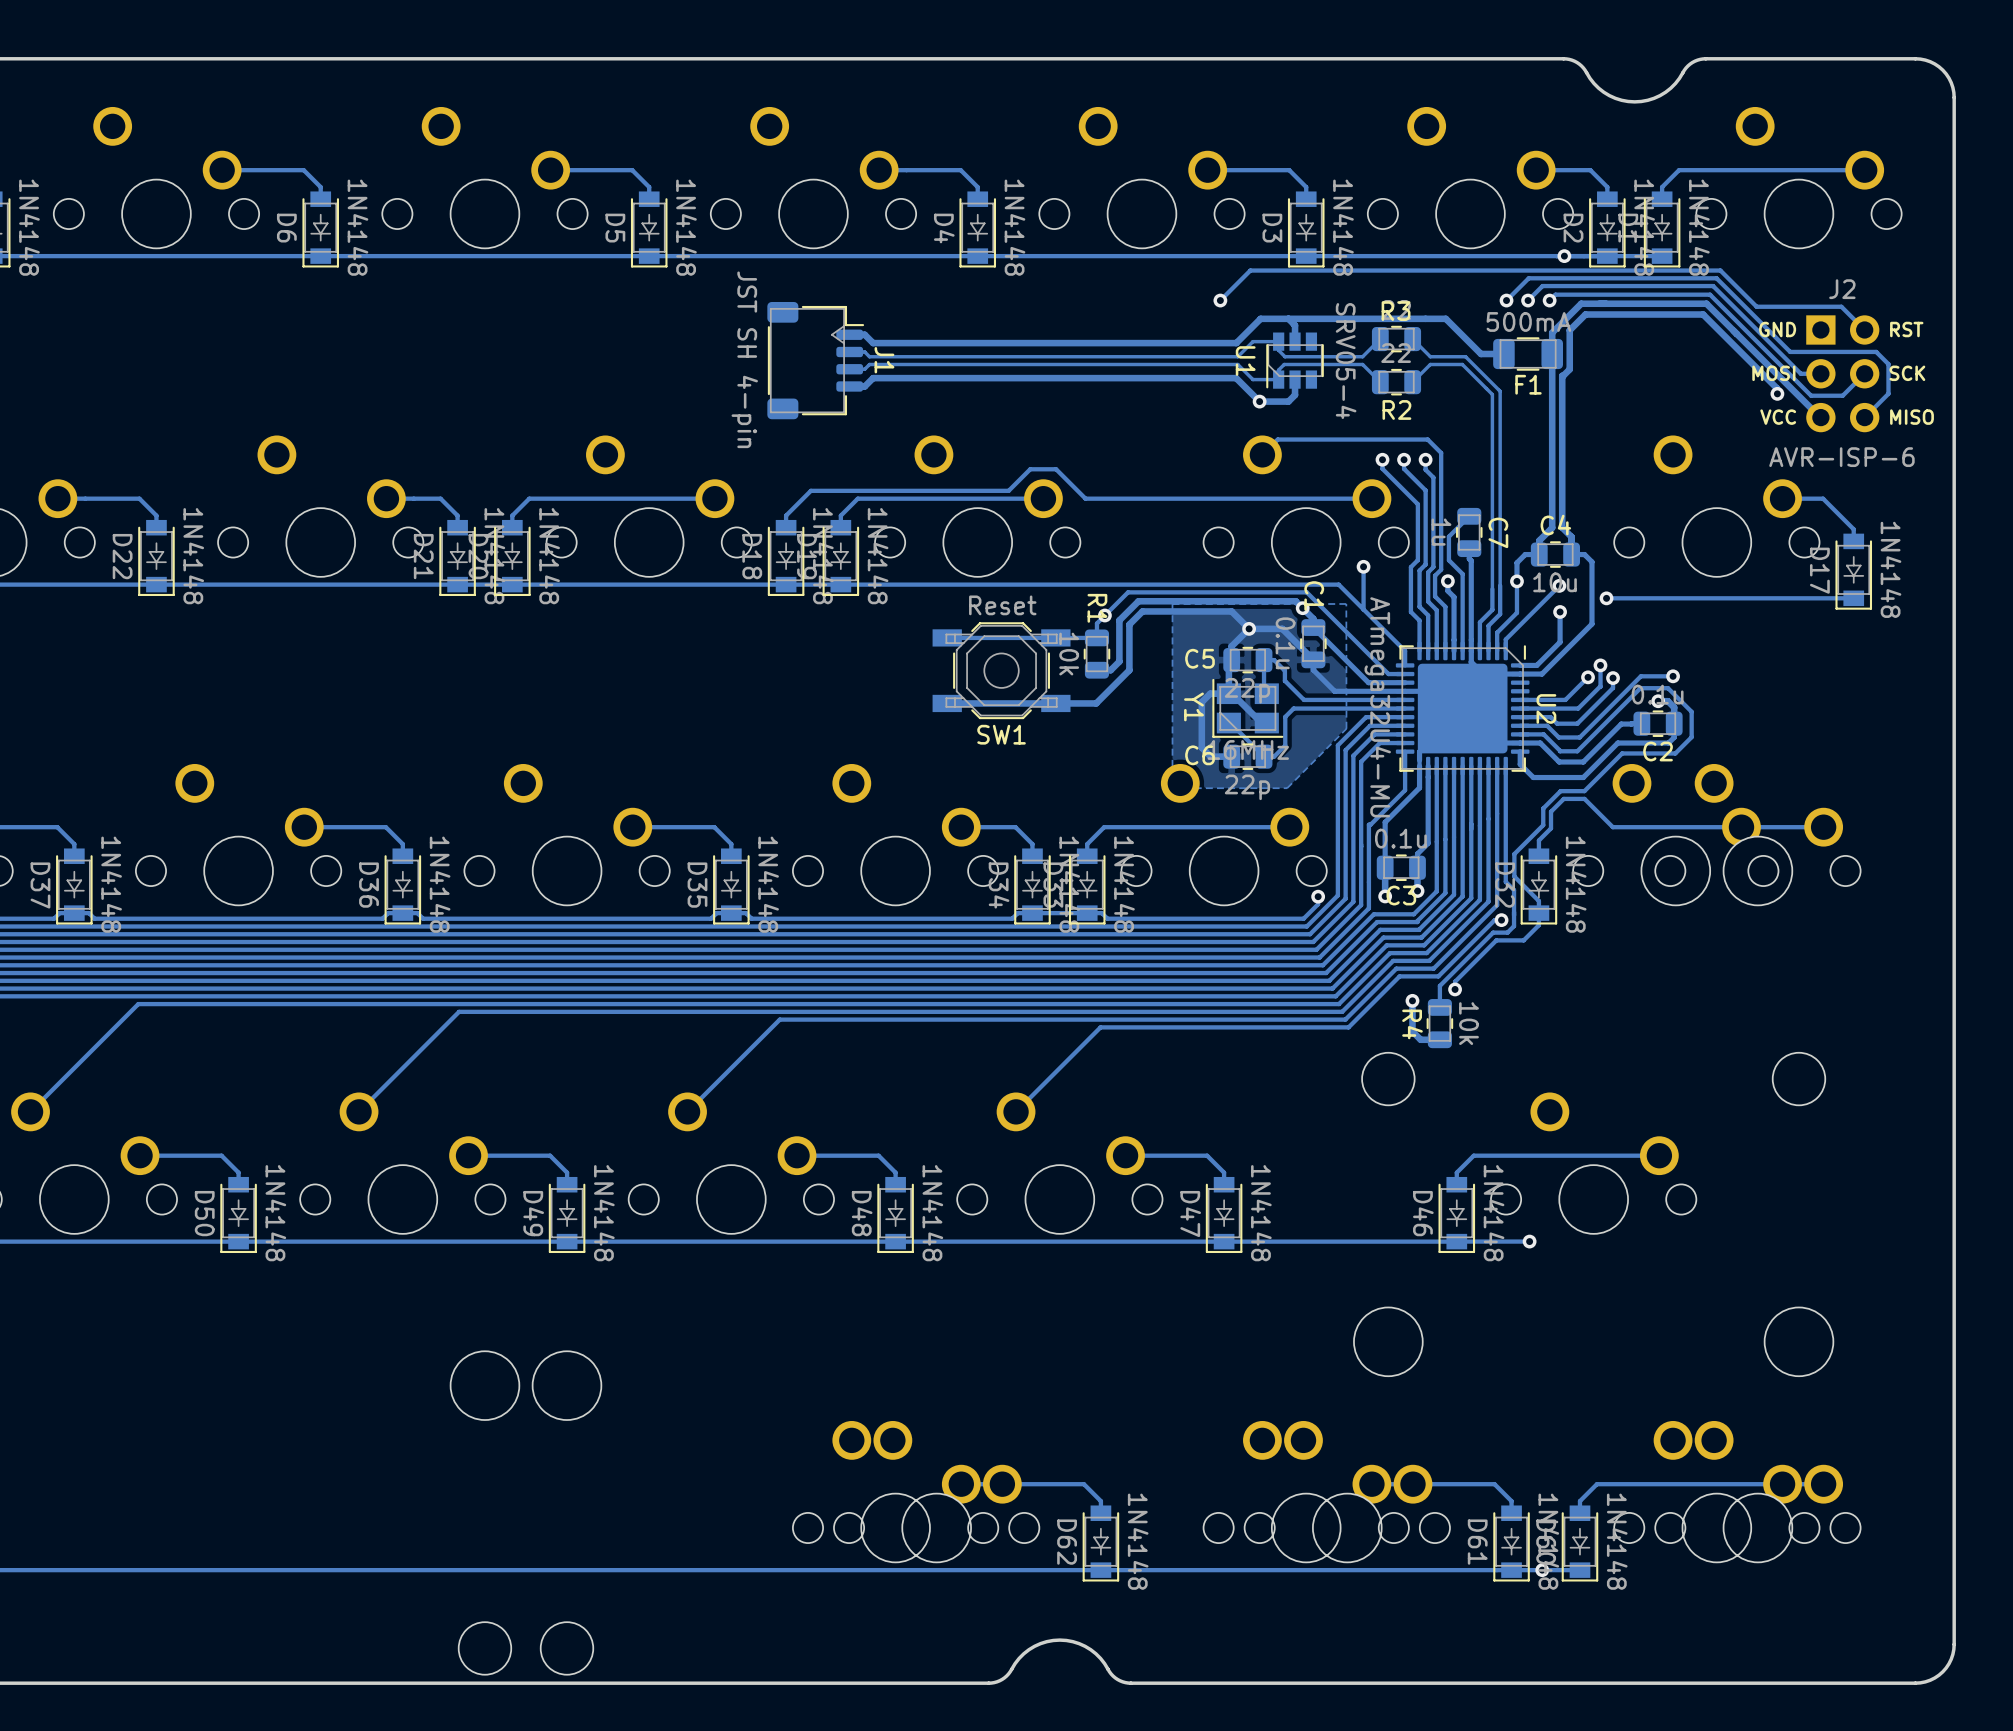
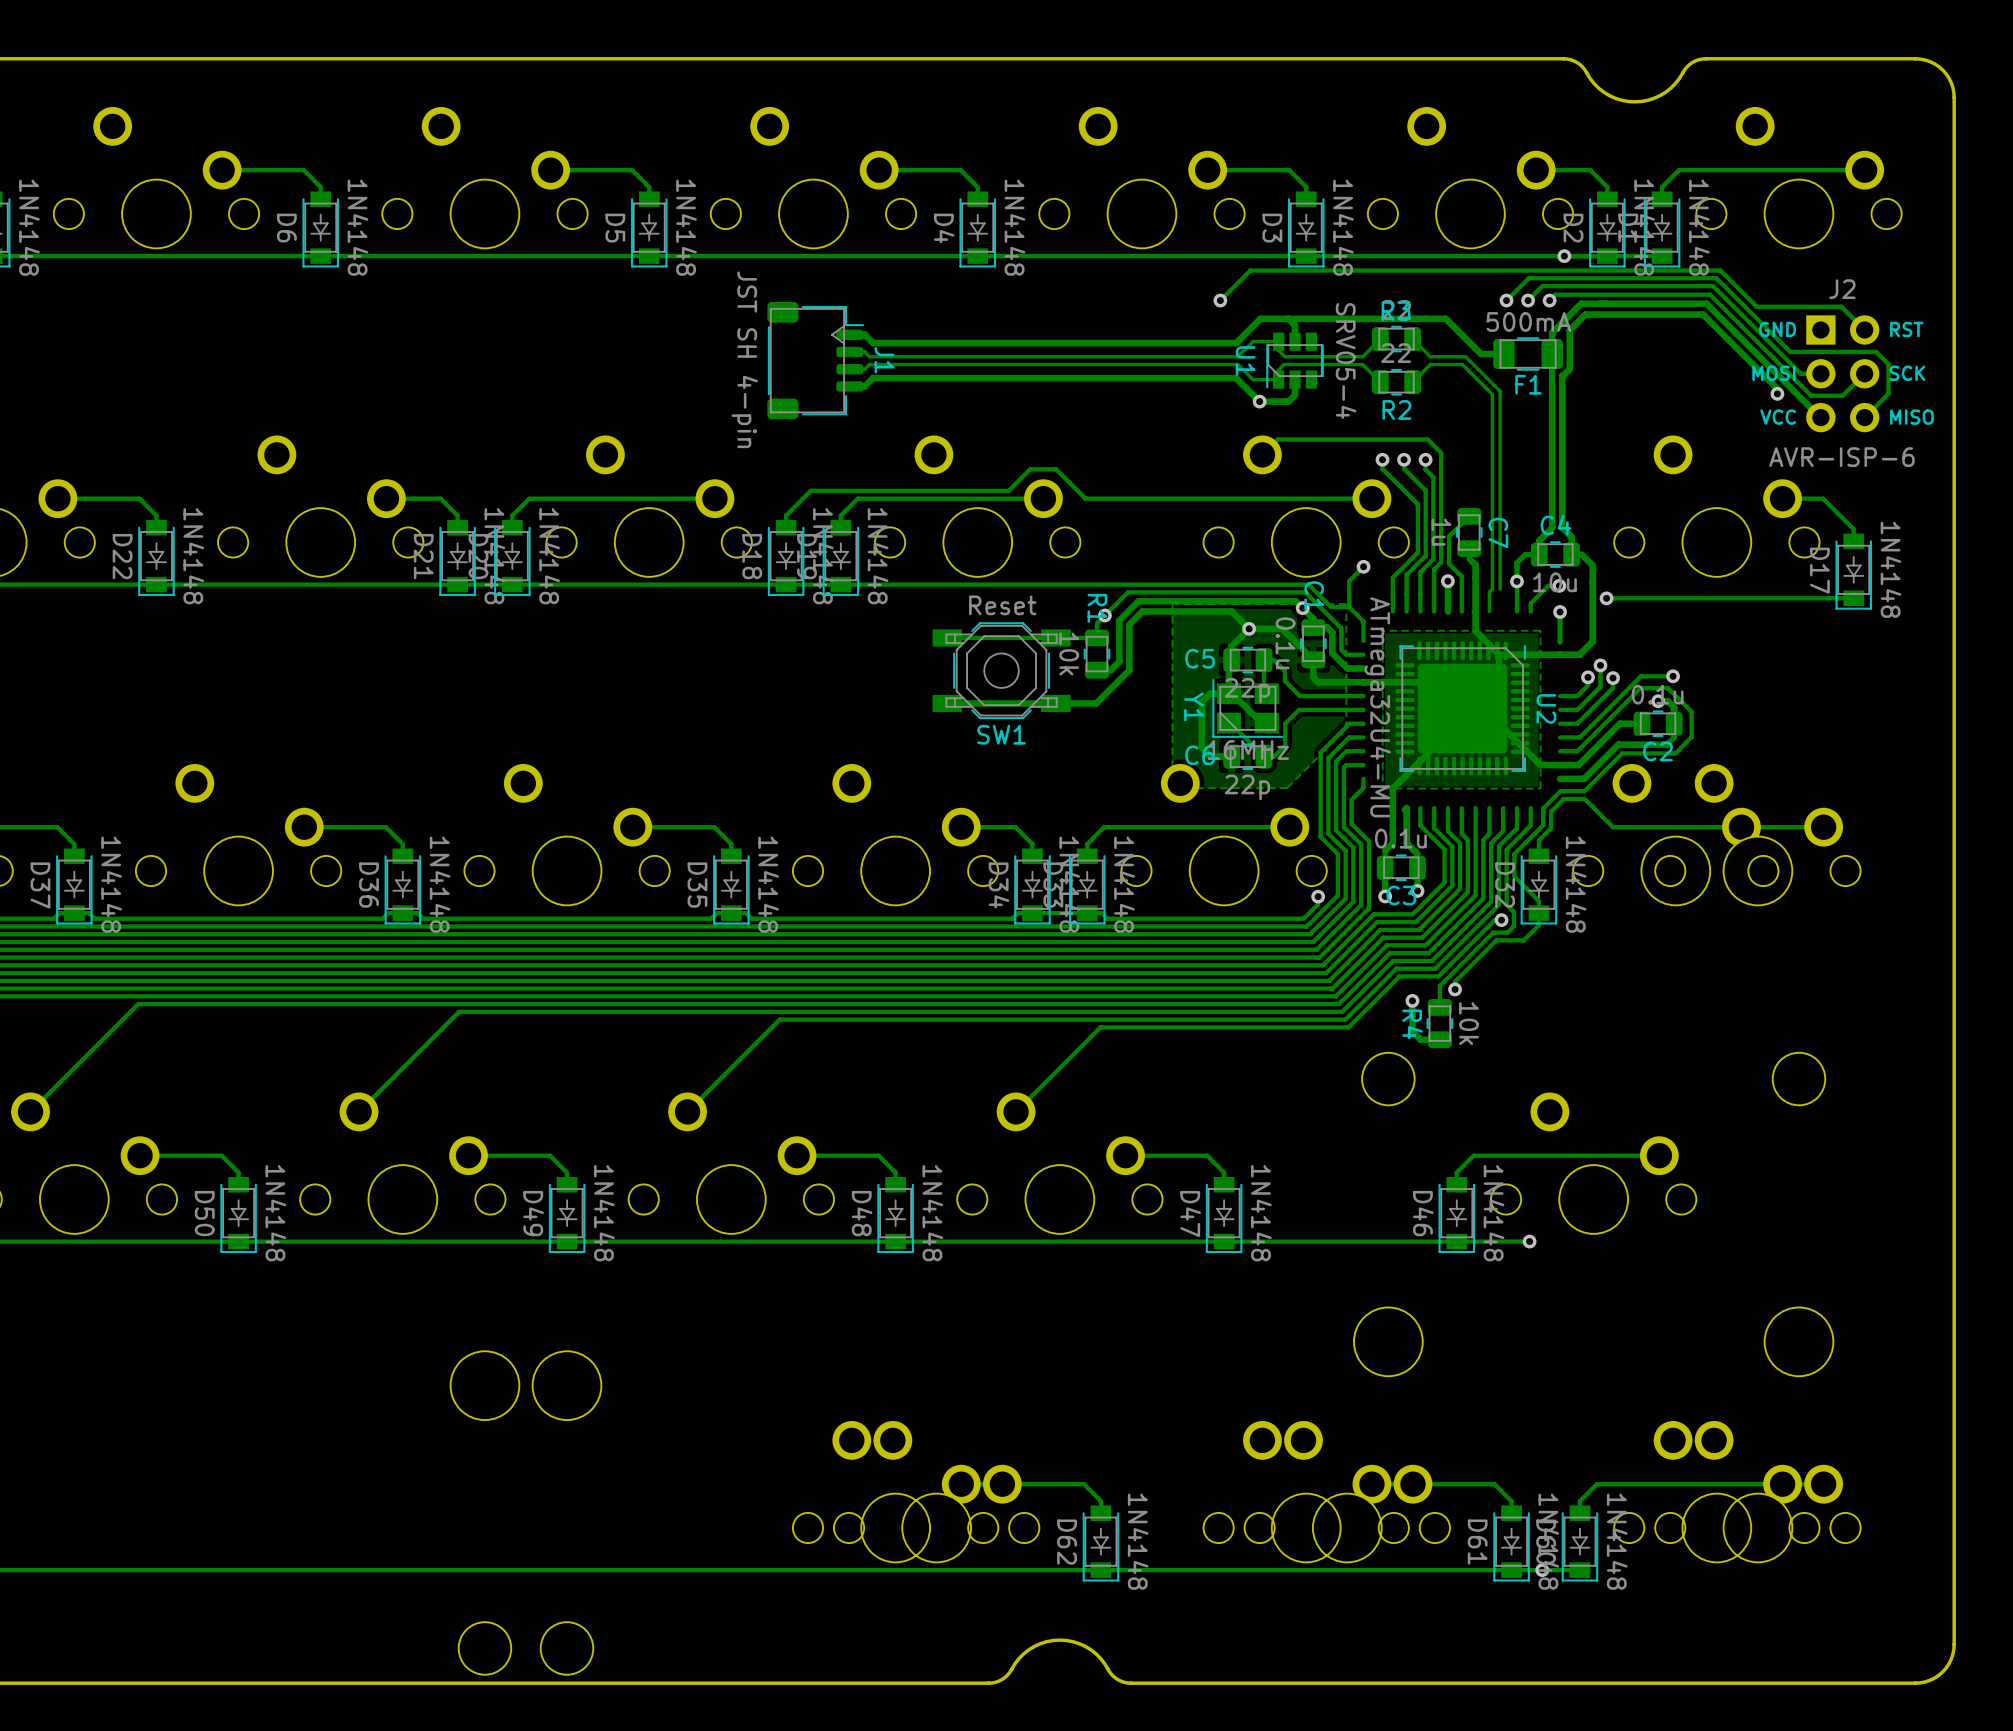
track: (1417, 552) (1417, 560) (1410, 567) (1410, 611) (1419, 620) (1419, 650) -> (1417, 552) (1392, 577) (1392, 611)
track: (1581, 554) (1584, 554) (1591, 561) (1591, 624) (1541, 674) (1483, 674) (1471, 661) -> (1581, 554) (1592, 565) (1592, 641) (1579, 654) (1499, 654)
track: (1425, 555) (1425, 564) (1419, 570) (1419, 606) (1428, 615) (1428, 650) -> (1425, 555) (1406, 574) (1406, 611)
track: (1433, 559) (1433, 567) (1428, 572) (1428, 601) (1436, 610) (1436, 650) -> (1433, 559) (1420, 572) (1420, 611)
track: (1448, 560) (1462, 574) (1462, 650) -> (1448, 560) (1448, 563) (1461, 576) (1461, 611)
track: (1471, 560) (1471, 699) (1419, 751) (1419, 760) -> (1471, 560) (1475, 565) (1475, 631) (1499, 654)
track: (1441, 562) (1441, 569) (1435, 575) (1435, 596) (1445, 606) (1445, 650) -> (1441, 562) (1434, 569) (1434, 611)
track: (1363, 566) (1363, 609) -> (1363, 566) (1349, 581) (1349, 607)
track: (1447, 581) (1447, 590) (1454, 597) (1454, 650) -> (1448, 581) (1448, 611)
track: (1308, 584) (1338, 584) (1405, 650) (1405, 665) -> (1308, 584) (1331, 607) (1349, 607)
track: (1500, 585) (1500, 614) (1488, 625) (1488, 650) -> none
track: (1559, 585) (1505, 639) (1505, 650) -> (1559, 585) (1548, 585) (1530, 603) (1530, 611)
track: (1492, 589) (1492, 609) (1479, 622) (1479, 650) -> (1492, 589) (1489, 592) (1489, 611)
track: (1305, 592) (1388, 674) (1405, 674) -> (1305, 592) (1341, 628) (1341, 649) (1346, 654) (1363, 654)
track: none -> (1349, 607) (1363, 621) (1363, 640)
track: (1516, 611) (1497, 632) (1497, 650) -> none
track: (1313, 627) (1368, 682) (1405, 682) -> (1313, 627) (1327, 627) (1332, 632) (1332, 653) (1347, 668) (1363, 668)
zone outline: none -> (1540, 630) (1540, 788) (1382, 788) (1382, 630) (1540, 630)
track: (1560, 642) (1536, 665) (1520, 665) -> none
track: none -> (1499, 654) (1499, 723) (1540, 765) (1578, 765) (1620, 723) (1631, 723)
track: (1313, 670) (1334, 691) (1445, 691) (1497, 743) (1540, 743) (1559, 762) (1583, 762) (1621, 724) (1631, 723) -> (1313, 670) (1313, 677) (1318, 682) (1419, 682) (1459, 722)
track: (1588, 677) (1565, 699) (1520, 699) -> (1588, 677) (1588, 685) (1577, 696) (1560, 696)
track: (1285, 680) (1304, 699) (1405, 699) -> (1284, 680) (1300, 696) (1363, 696)
track: (1600, 686) (1578, 708) (1520, 708) -> (1600, 686) (1577, 709) (1560, 709)
track: (1405, 708) (1293, 708) (1285, 716) (1285, 723) -> (1363, 709) (1299, 709) (1285, 723)
track: (1405, 717) (1366, 717) (1337, 745) (1337, 854) -> (1363, 723) (1349, 723) (1320, 752) (1320, 836) (1337, 854)
track: (1520, 717) (1550, 717) (1557, 723) (1560, 723) -> none
track: (1405, 725) (1370, 725) (1345, 750) (1345, 850) -> (1363, 737) (1349, 737) (1328, 758) (1328, 833) (1345, 850)
track: (1520, 725) (1547, 725) (1560, 737) -> none
track: (1405, 734) (1374, 734) (1353, 755) (1353, 847) -> (1363, 751) (1346, 751) (1336, 761) (1336, 830) (1353, 847)
track: (1520, 734) (1543, 734) (1560, 751) -> none
track: (1405, 743) (1379, 743) (1361, 761) (1361, 844) -> (1363, 765) (1346, 765) (1343, 767) (1343, 827) (1361, 844)
track: (1668, 743) (1617, 743) (1583, 777) (1533, 777) (1520, 764) (1520, 751) -> (1668, 743) (1667, 744) (1618, 744) (1584, 778) (1560, 778)
track: (1405, 751) (1405, 790) (1368, 824) (1368, 841) -> (1363, 778) (1363, 787) (1351, 799) (1351, 823) (1368, 841)
track: (1419, 766) (1419, 787) (1385, 822) (1385, 850) -> (1459, 722) (1392, 788) (1392, 843) (1385, 850)
track: (1428, 766) (1428, 843) (1417, 853) -> (1404, 809) (1406, 808) (1406, 843) (1417, 853)
track: (1436, 766) (1436, 891) (1412, 914) -> (1420, 808) (1420, 825) (1444, 849) (1444, 882) (1412, 914)
track: (1445, 766) (1445, 893) (1415, 922) -> (1434, 808) (1434, 828) (1452, 846) (1452, 885) (1415, 922)
track: (1454, 766) (1454, 894) (1419, 929) -> (1448, 808) (1448, 831) (1460, 843) (1460, 888) (1419, 929)
track: (1462, 766) (1462, 896) (1421, 937) -> (1461, 808) (1461, 833) (1467, 839) (1467, 892) (1421, 937)
track: (1471, 766) (1471, 898) (1424, 945) -> (1475, 808) (1475, 895) (1424, 945)
track: (1479, 766) (1479, 899) (1426, 953) -> (1489, 808) (1489, 833) (1483, 839) (1483, 898) (1426, 953)
track: (1488, 766) (1488, 901) (1429, 960) -> (1503, 808) (1503, 831) (1491, 843) (1491, 901) (1432, 960) (1429, 960)
track: (1497, 766) (1497, 905) (1433, 968) -> (1516, 808) (1516, 828) (1498, 846) (1498, 904) (1433, 968)
track: (1505, 766) (1505, 881) (1514, 890) (1514, 912) -> (1530, 808) (1530, 825) (1506, 849) (1506, 904) (1514, 912)

